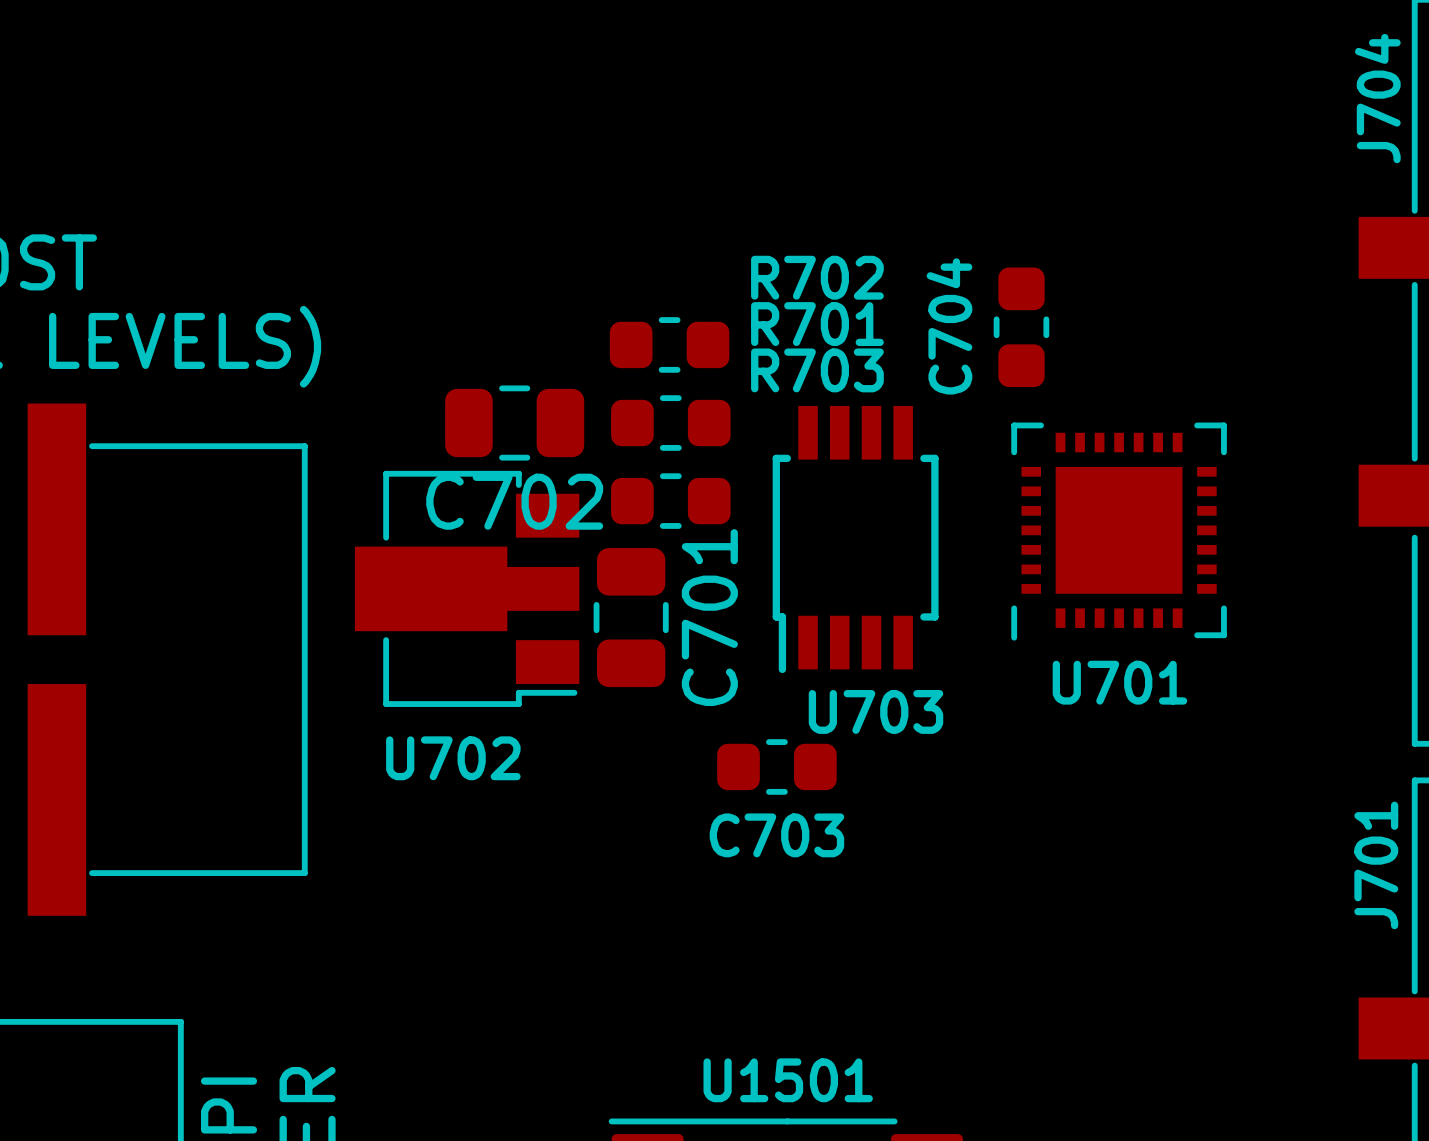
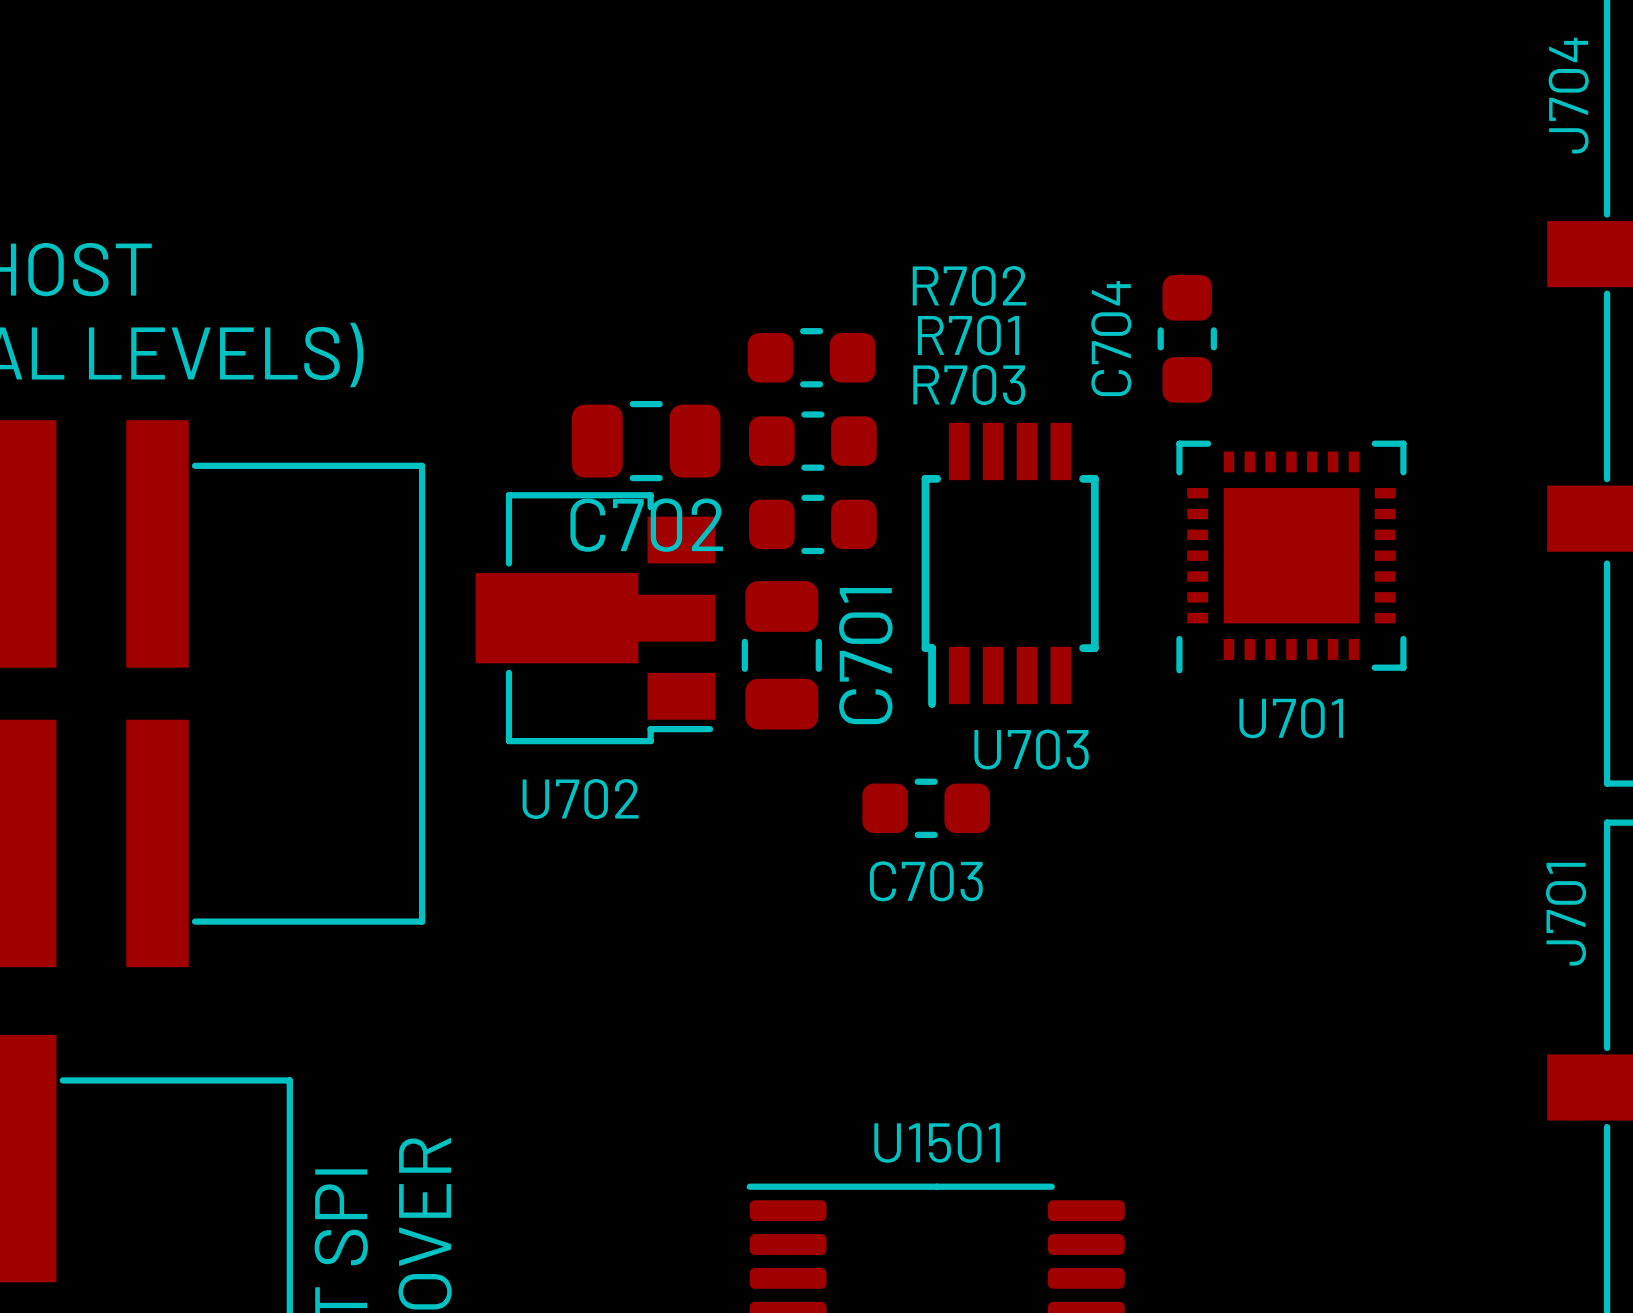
C701 position: (631, 617) -> (781, 655)

